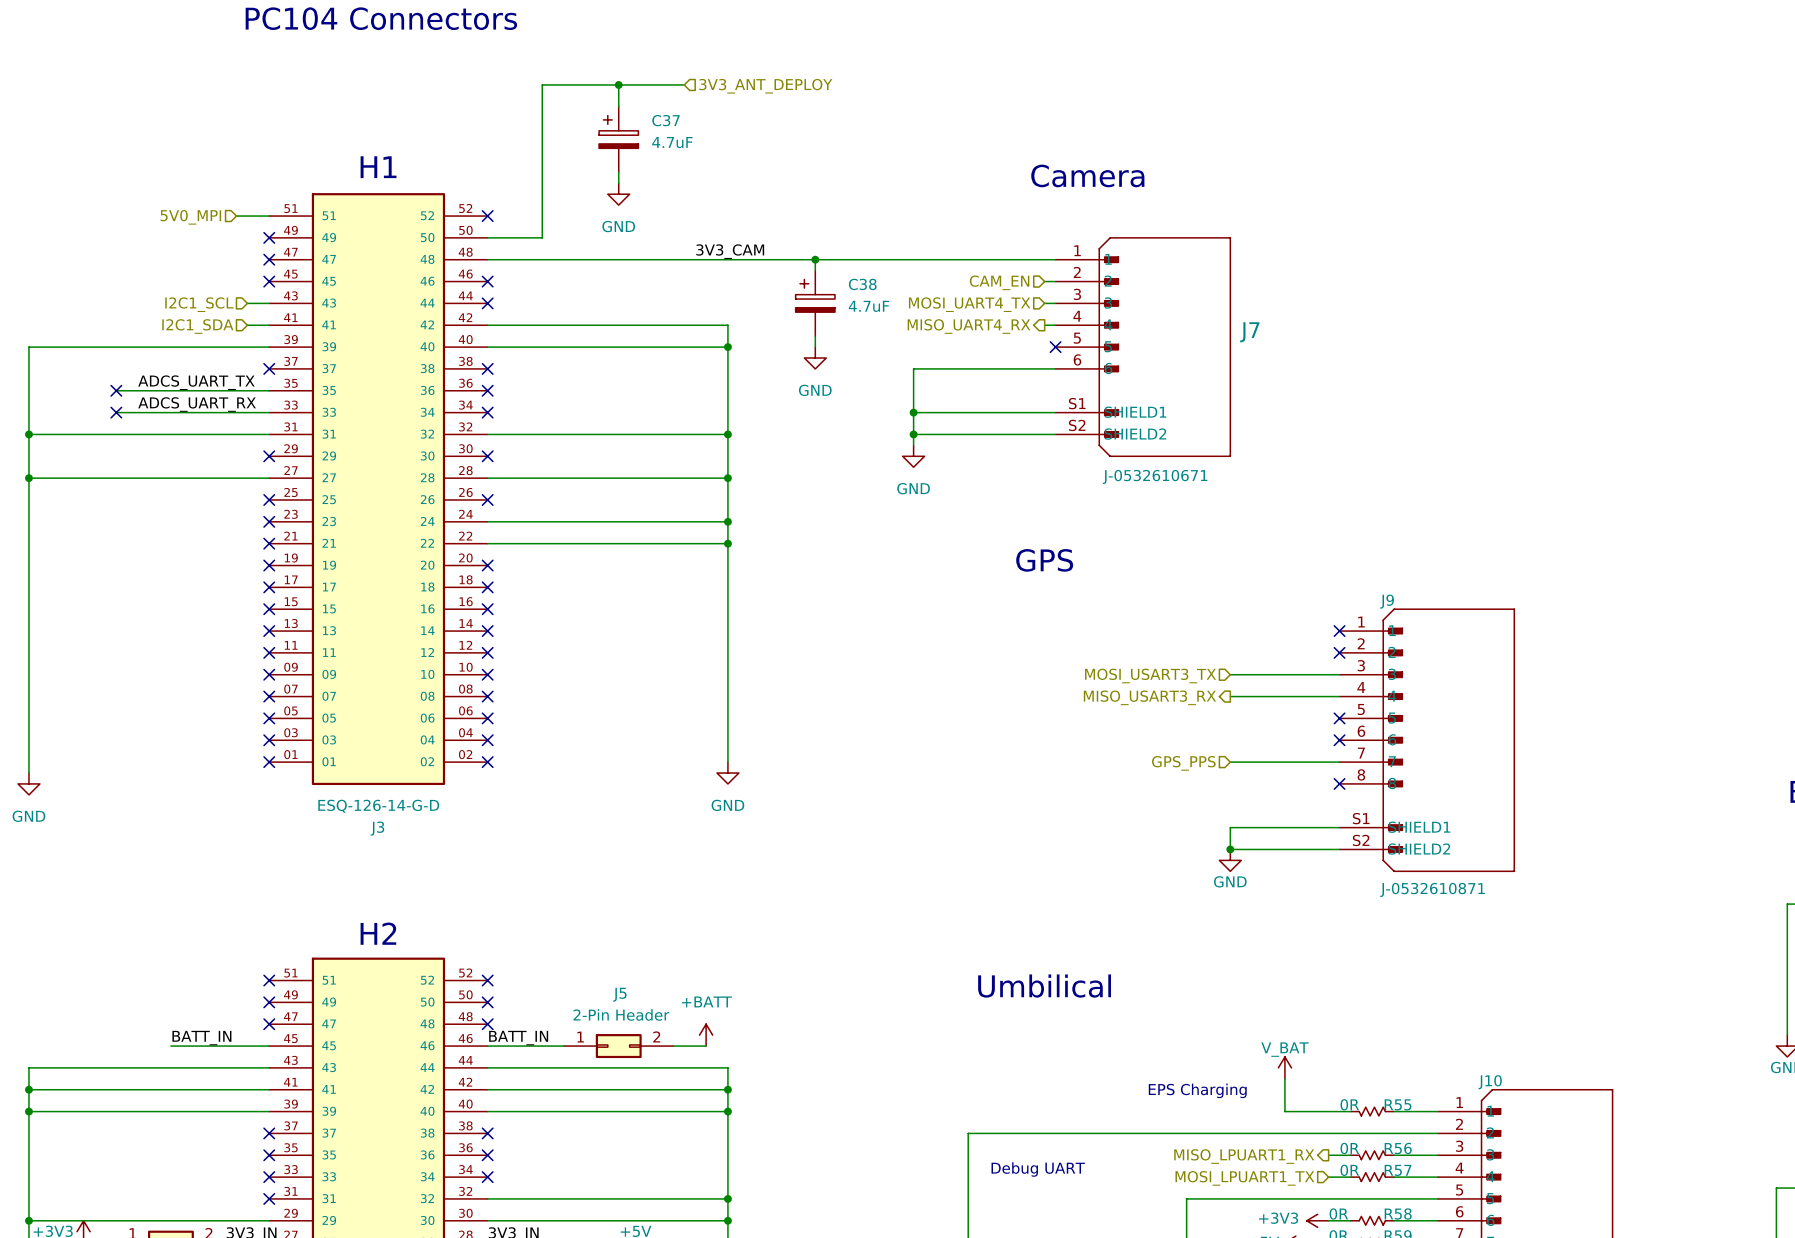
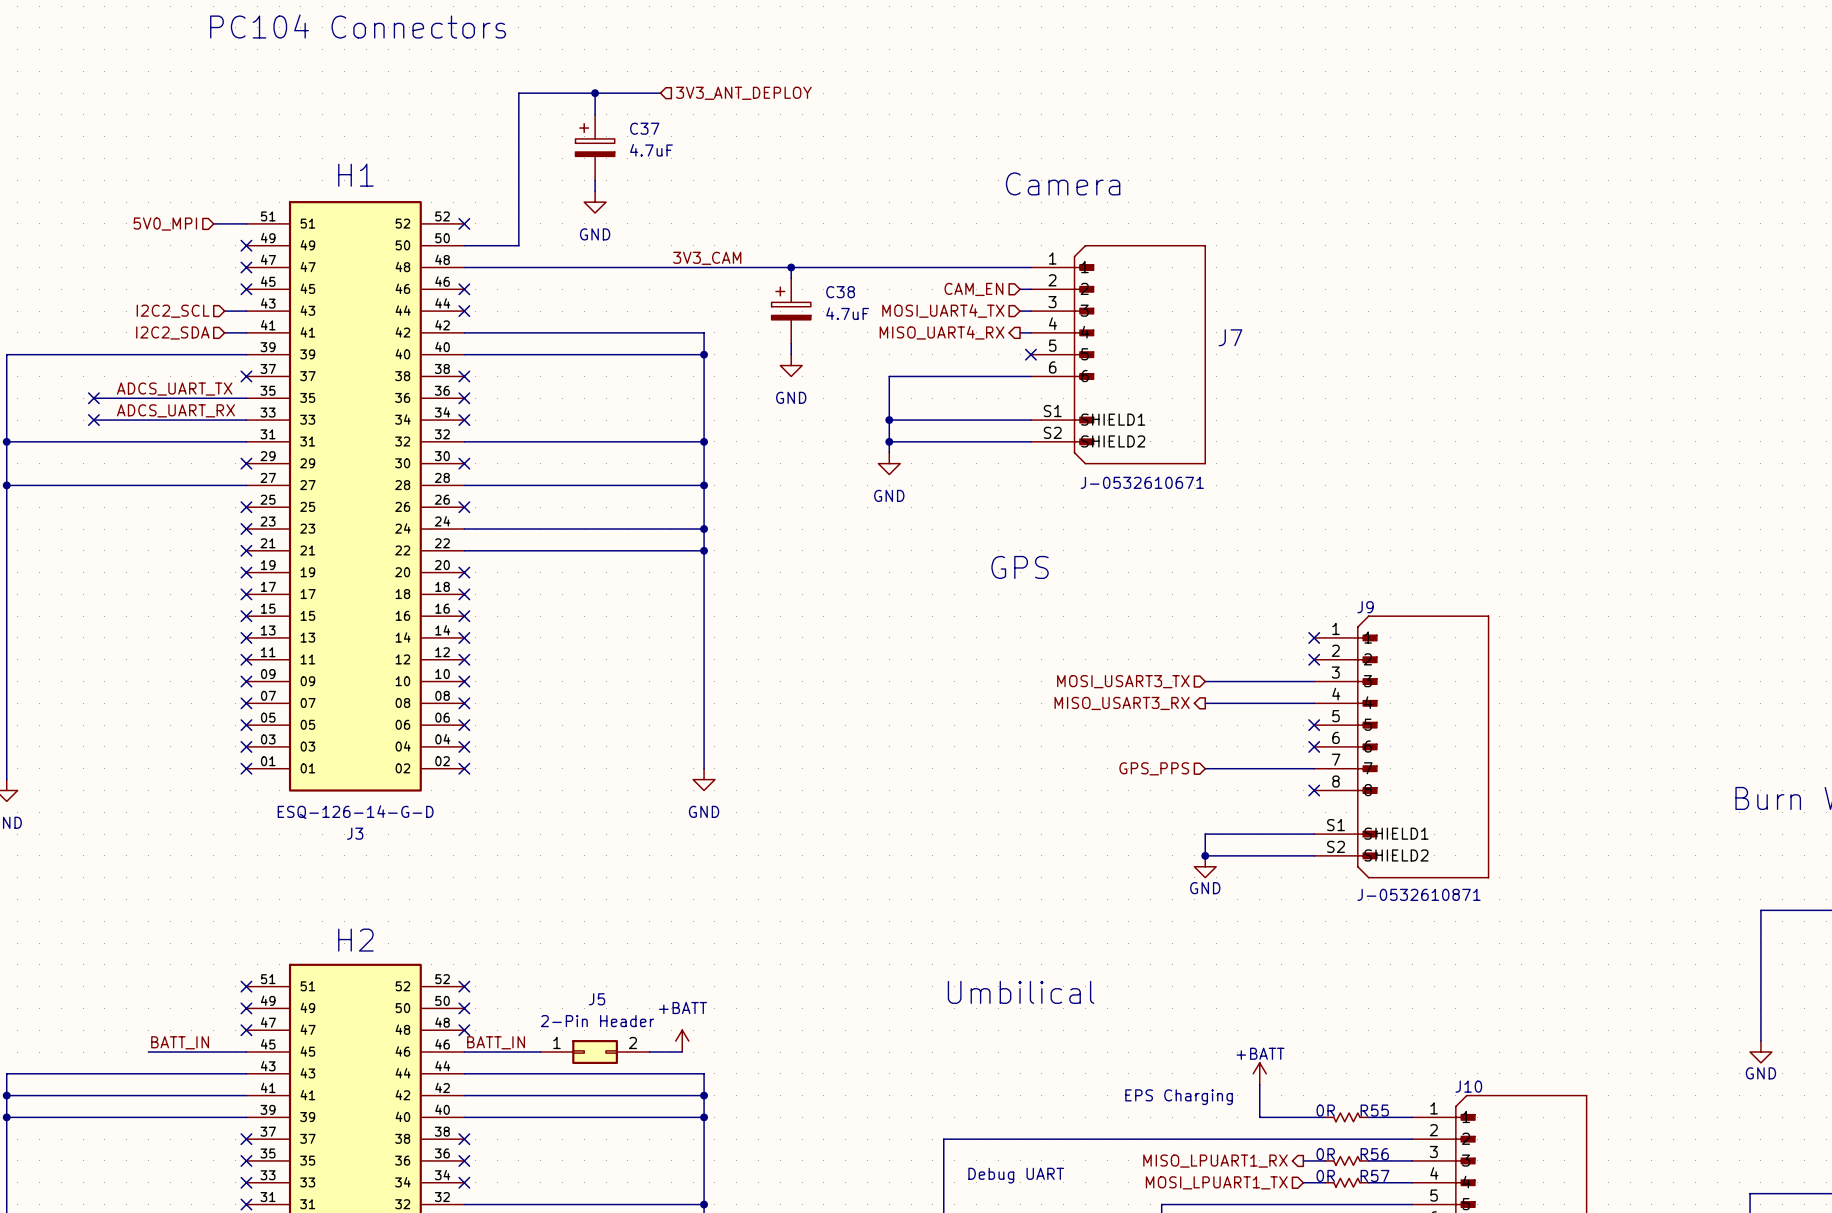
hierarchical label: I2C1_SCL (199, 304) -> I2C2_SCL (173, 311)
hierarchical label: I2C1_SDA (197, 326) -> I2C2_SDA (172, 332)
power symbol: V_BAT (1284, 1067) -> +BATT (1259, 1073)

